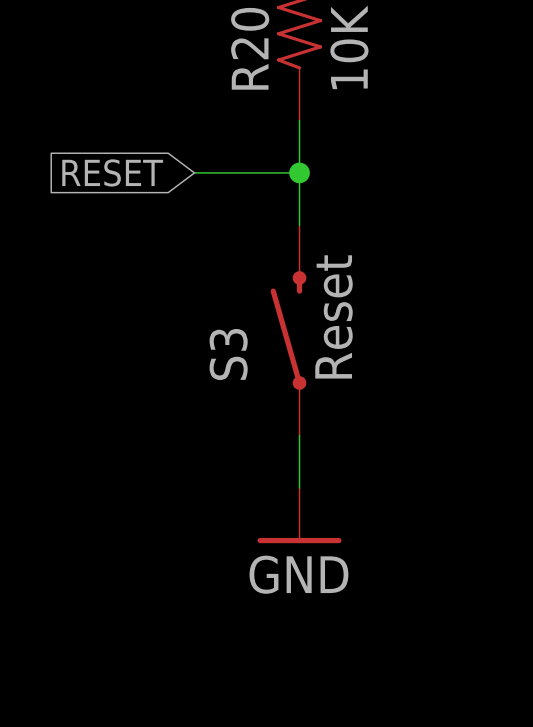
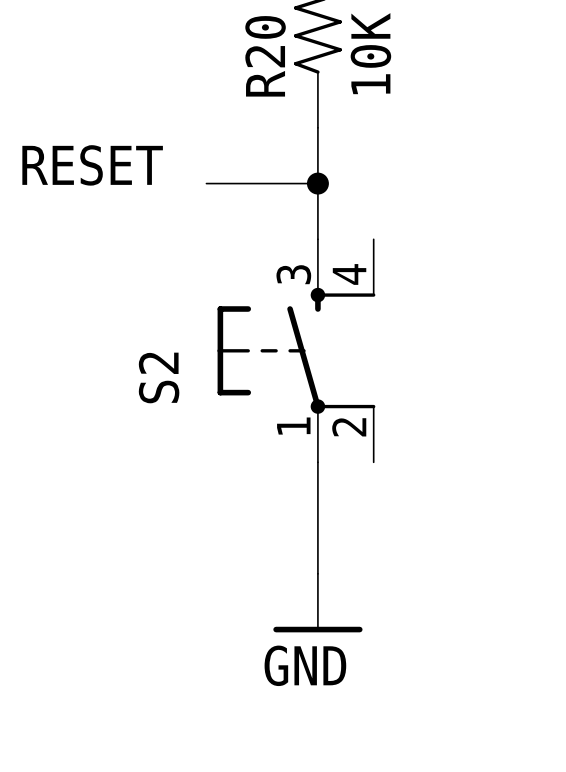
label: none -> RESET (92, 165)
global label: RESET (112, 172) -> none
S2: none -> (296, 350)
S3: Reset (288, 330) -> none
power symbol position: GND (299, 515) -> GND (317, 603)

